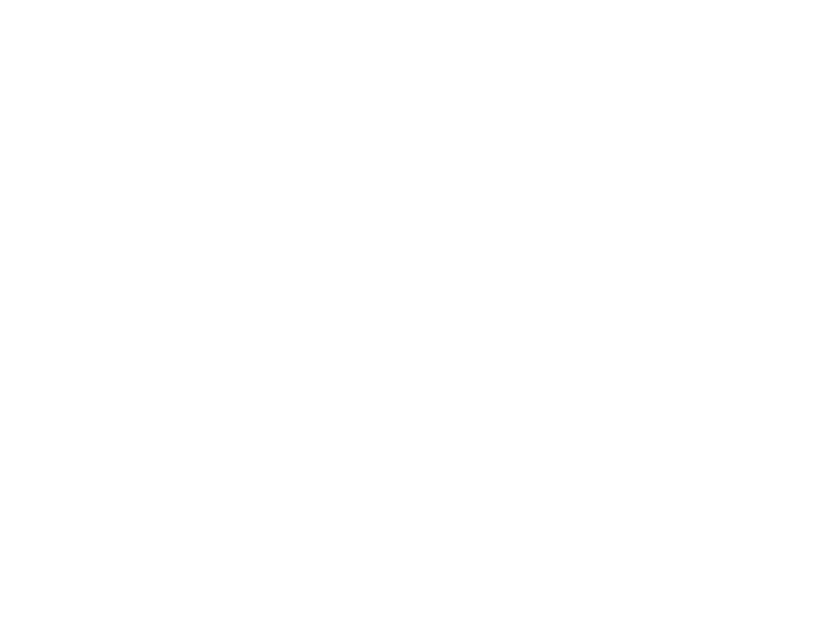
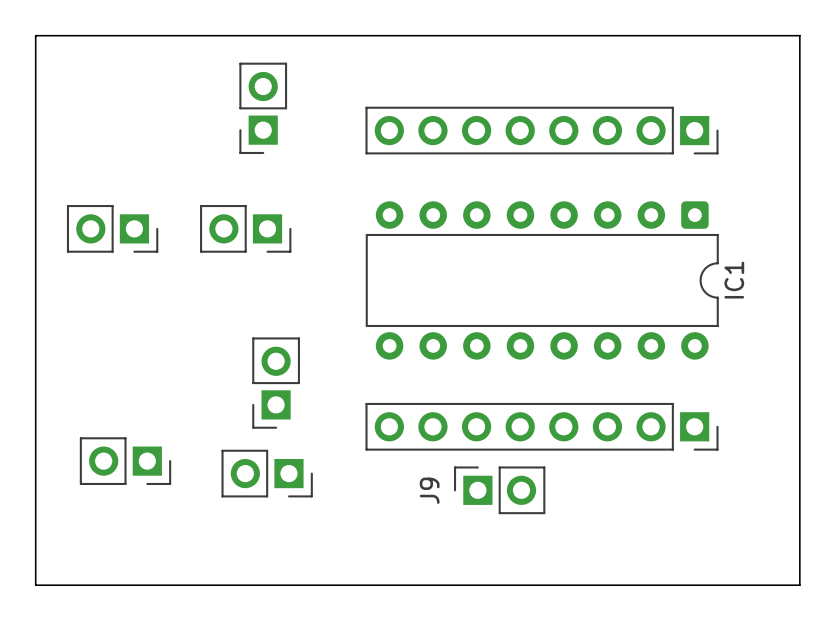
board edge: none -> (35, 35) (799, 35) (799, 585) (35, 585) (35, 35)
part: none -> (263, 108)
part: none -> (542, 130)
part: none -> (112, 228)
part: none -> (245, 228)
IC1: none -> (542, 280)
part: none -> (276, 383)
part: none -> (542, 426)
part: none -> (125, 461)
part: none -> (267, 473)
J9: none -> (499, 490)

